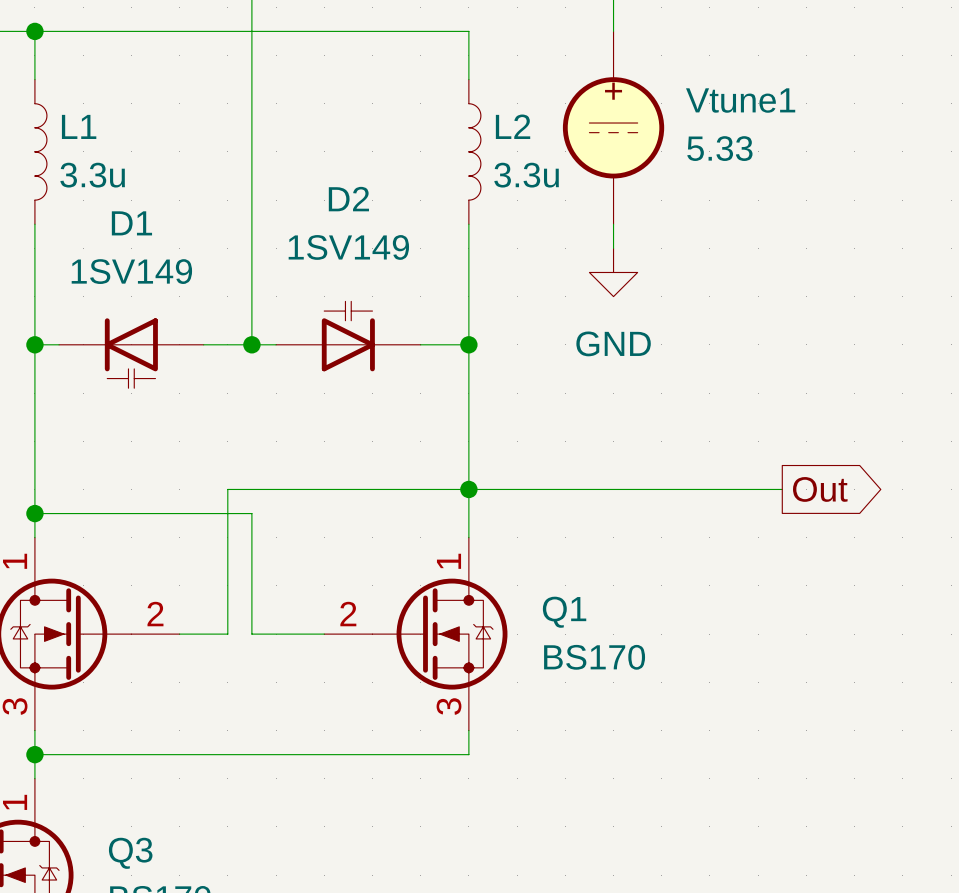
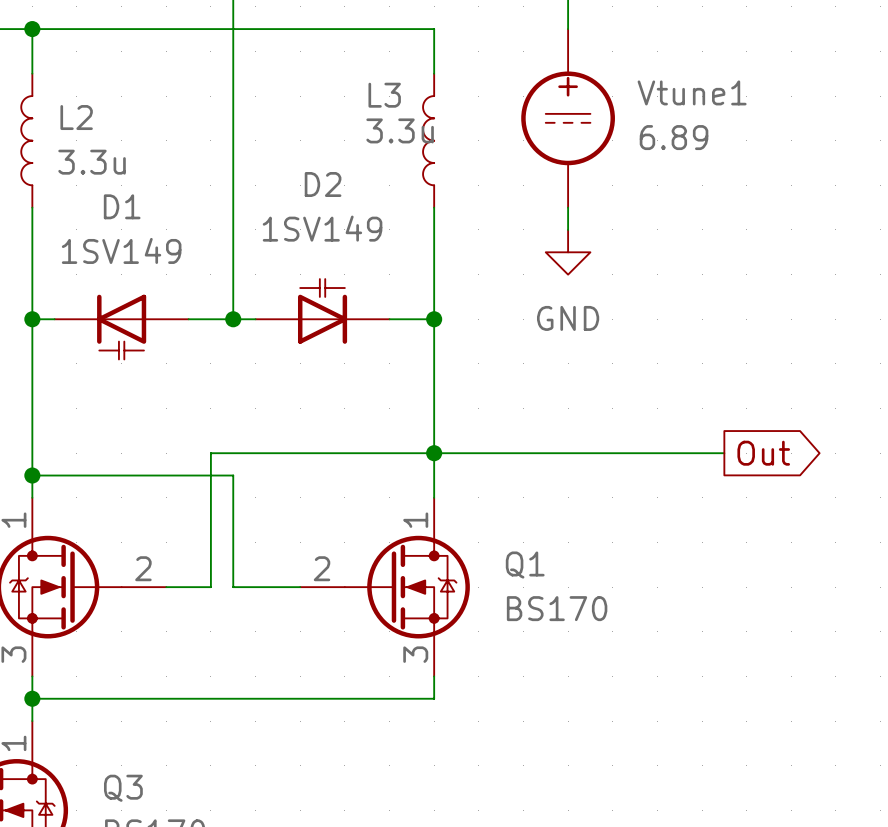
Vtune1 value: 5.33 (719, 148) -> 6.89 (674, 137)
L1: 3.3u (40, 151) -> none
L3: none -> 3.3u (428, 140)
L2 rotation: 0° (474, 151) -> 180° (26, 140)
L2 position: (474, 151) -> (26, 140)

